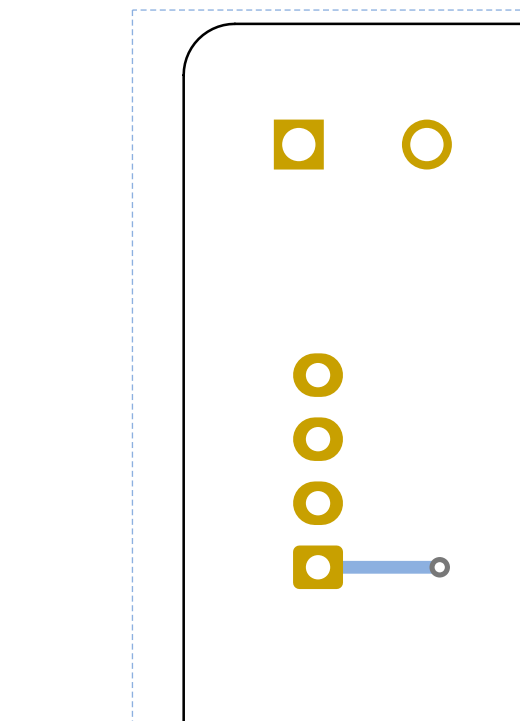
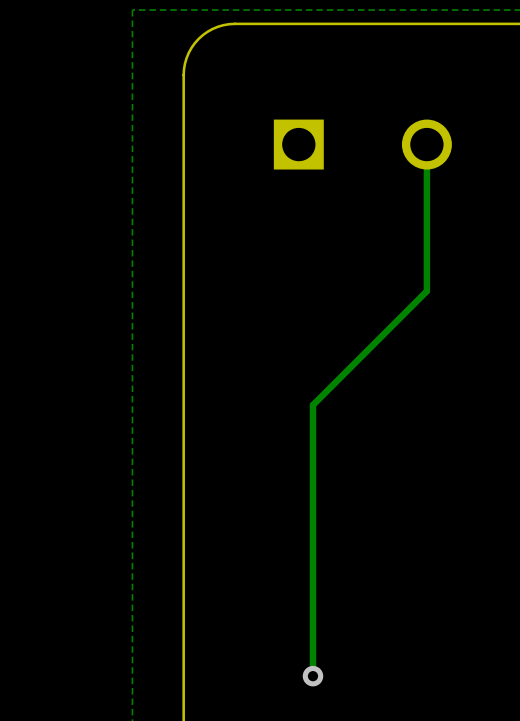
track: none -> (426, 123) (426, 291) (312, 405) (312, 676)
part: (318, 471) -> none
track: (439, 567) (318, 567) -> none
via: (439, 567) -> none
via: none -> (312, 676)

